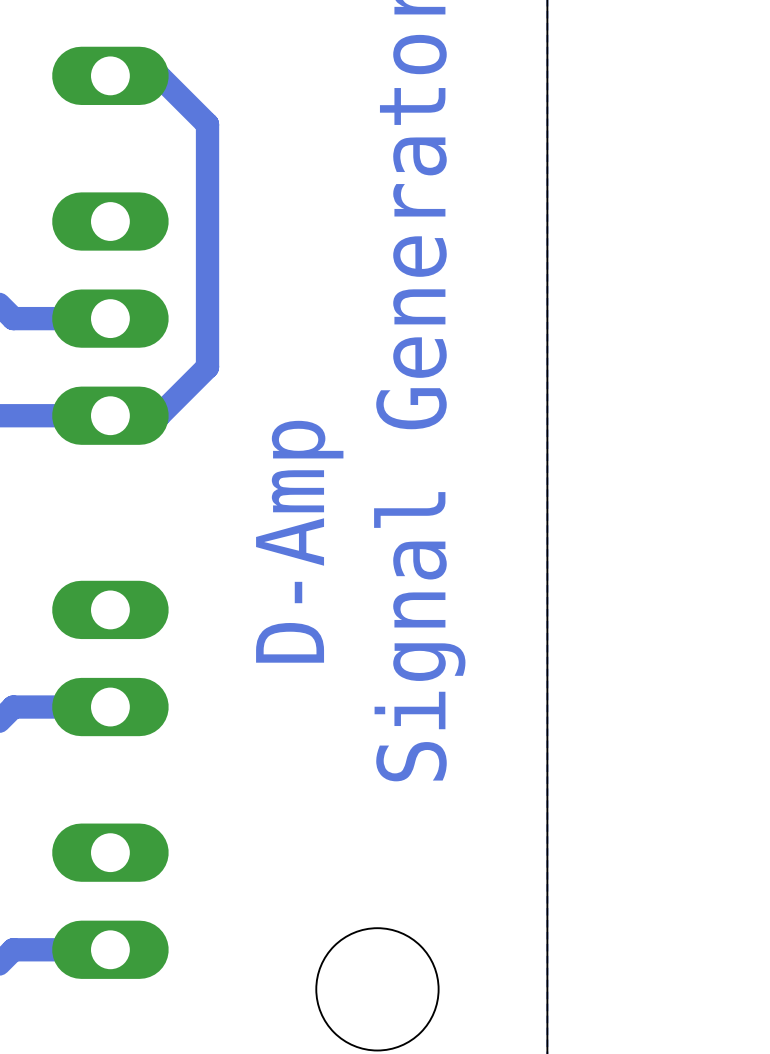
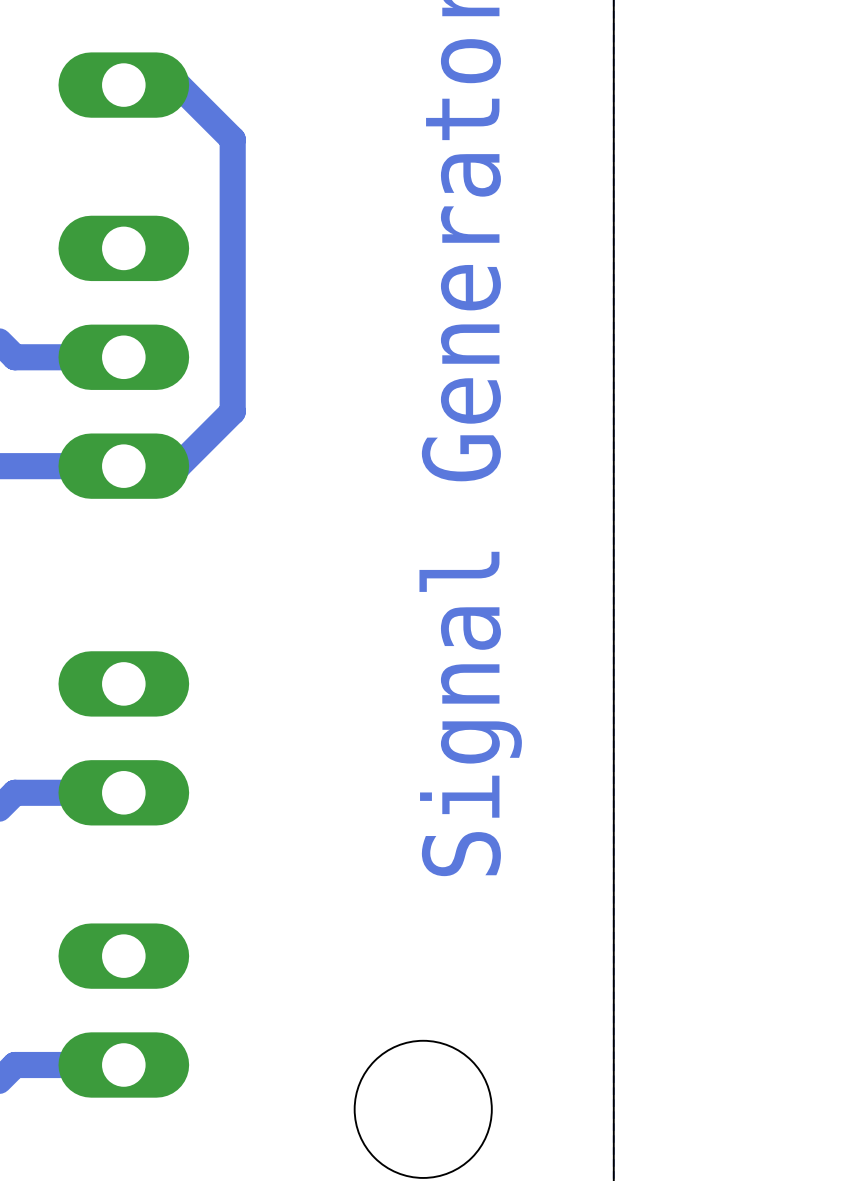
text: D-Amp (299, 541) -> none

